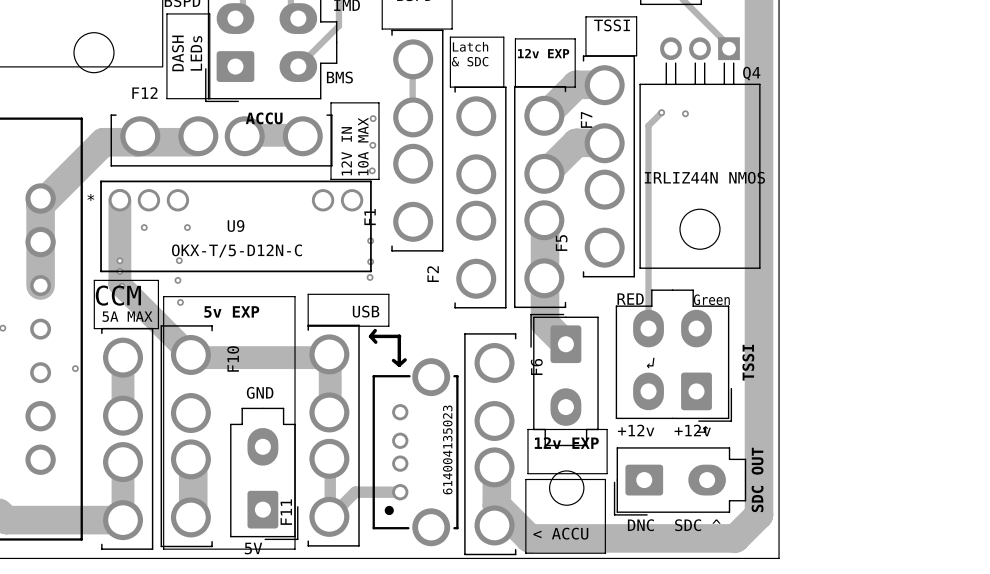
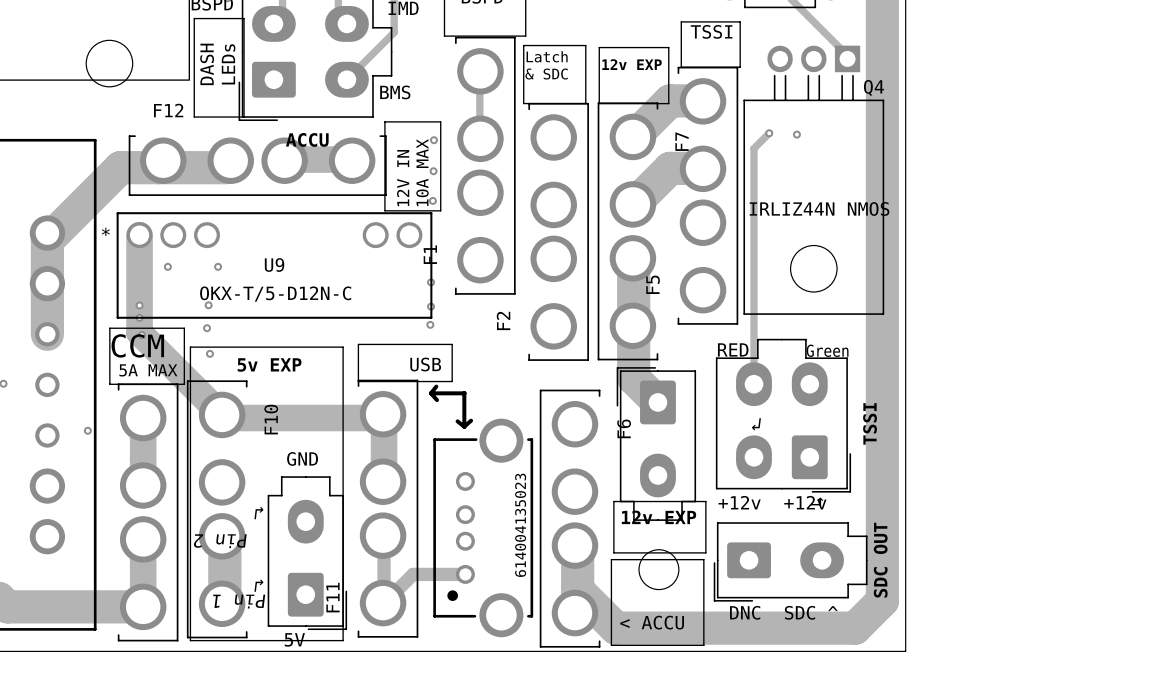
part text: none -> ↲ (258, 513)
part text: none -> Pin 2 (220, 541)
part text: none -> ↲ (258, 585)
part text: none -> Pin 1 (239, 601)

